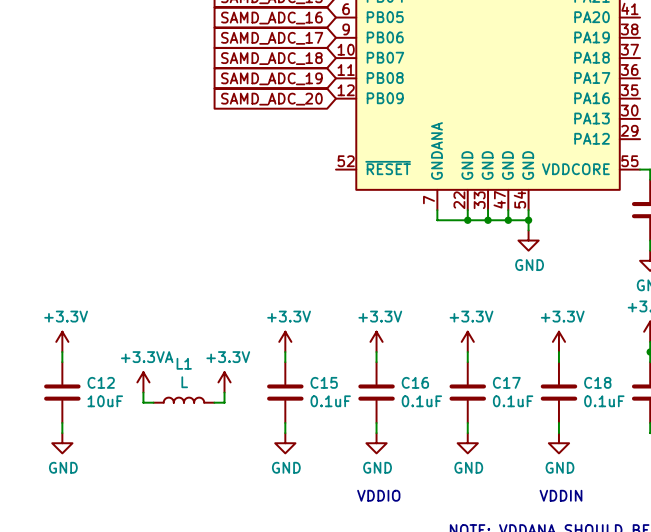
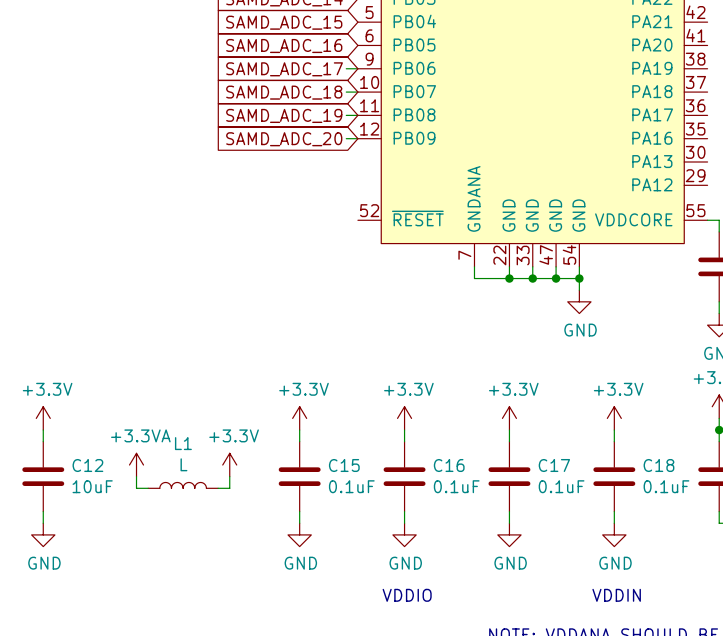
wire: none -> (346, 68) (357, 68)
wire: none -> (346, 92) (357, 92)
wire: none -> (346, 115) (357, 115)
wire: none -> (346, 138) (357, 138)

